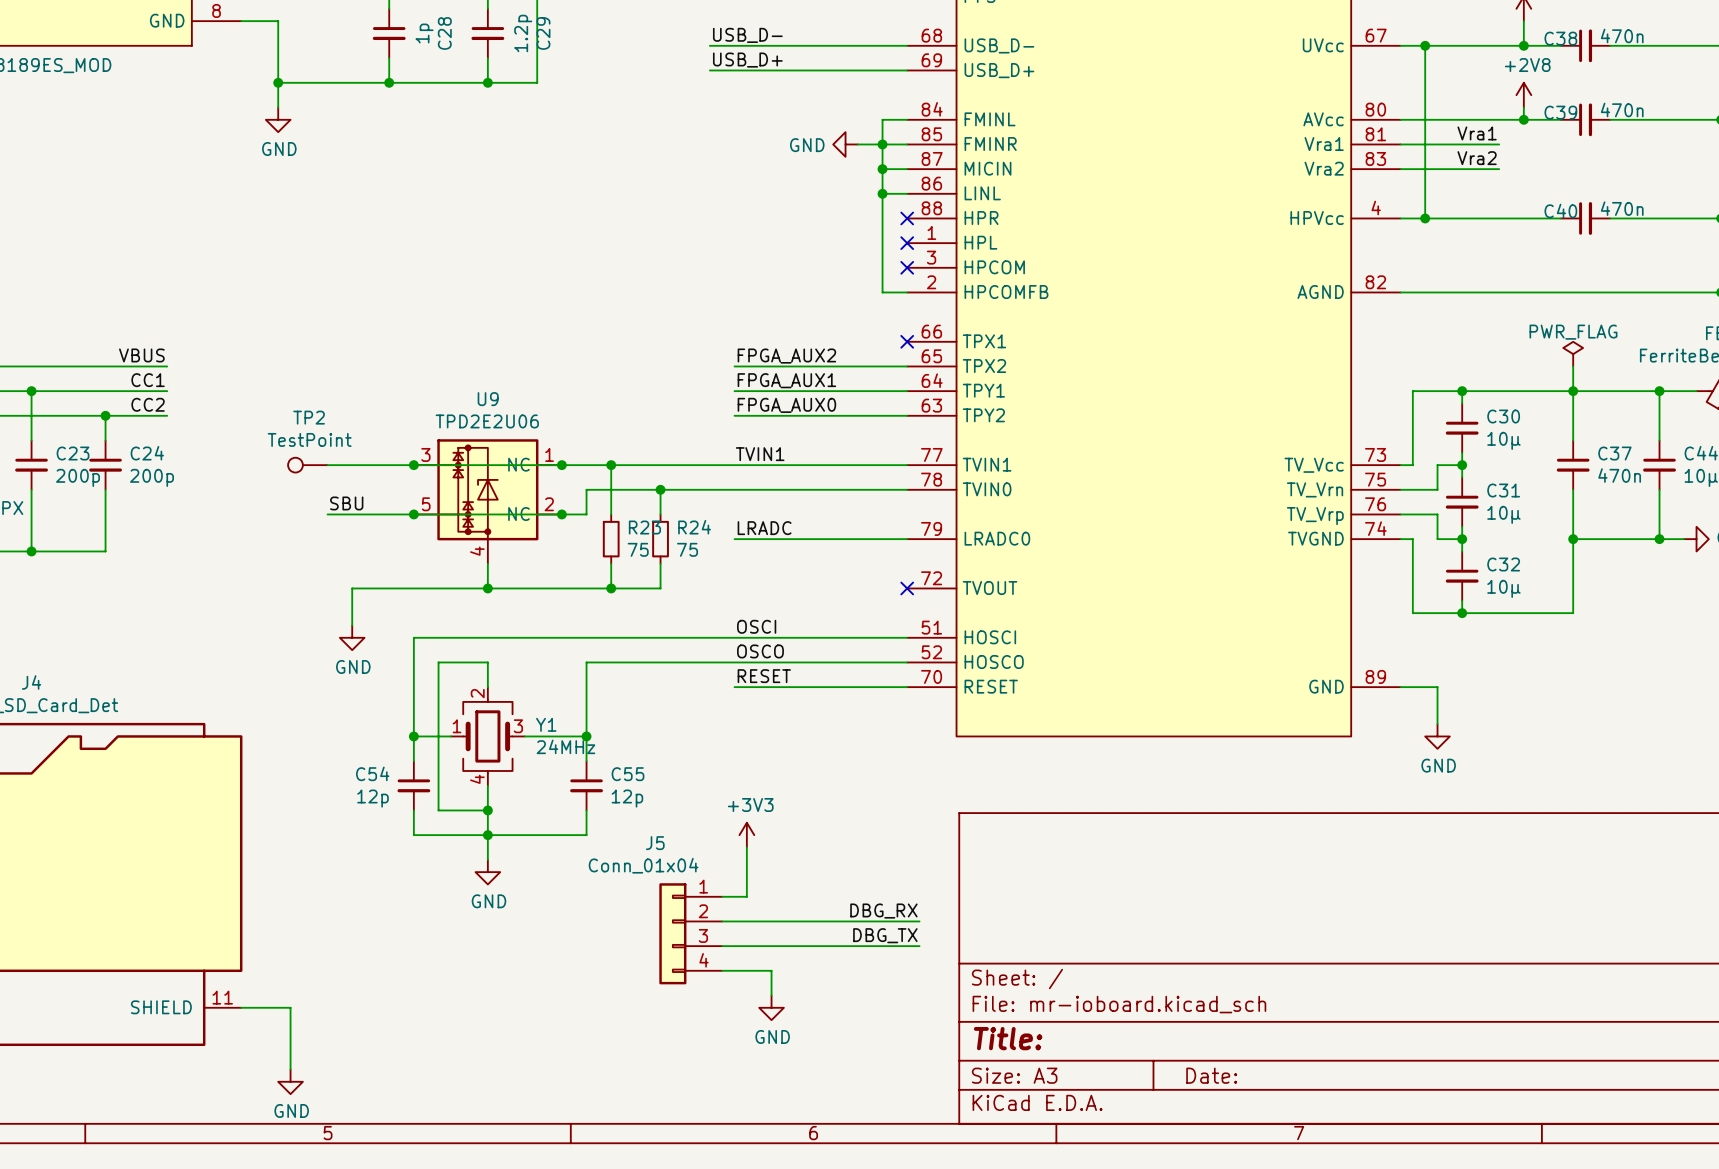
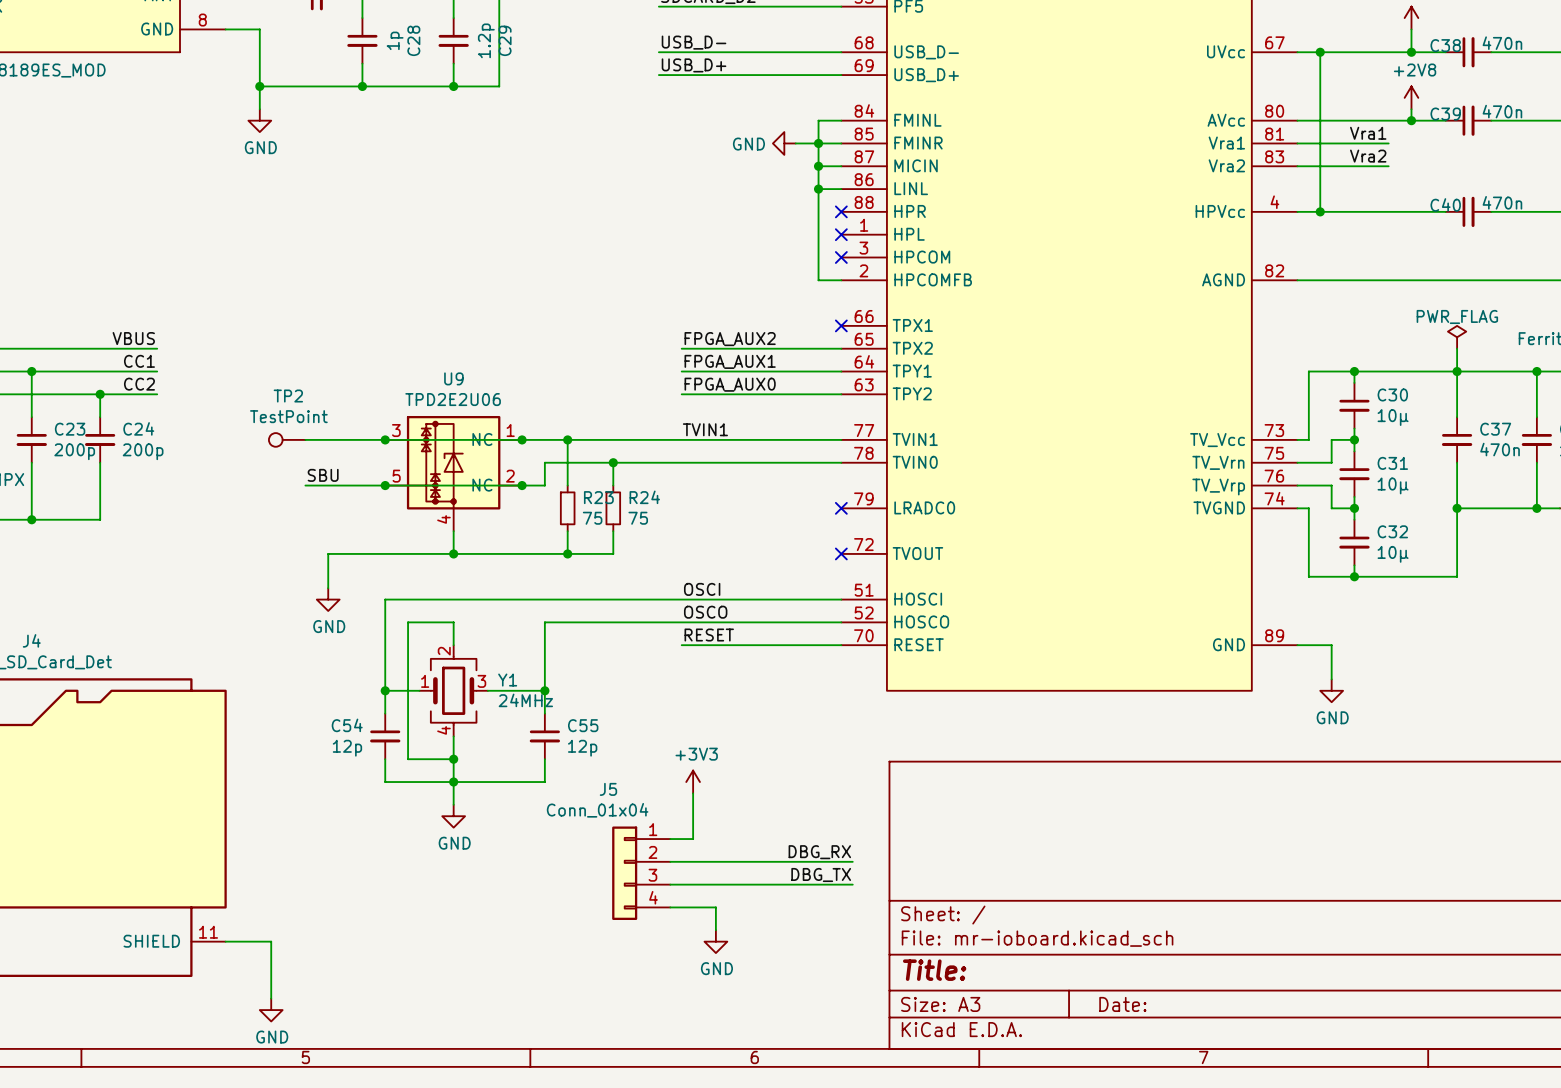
label: LRADC (764, 528) -> none
wire: (734, 539) (907, 539) -> none
no-connect mark: none -> (841, 508)

